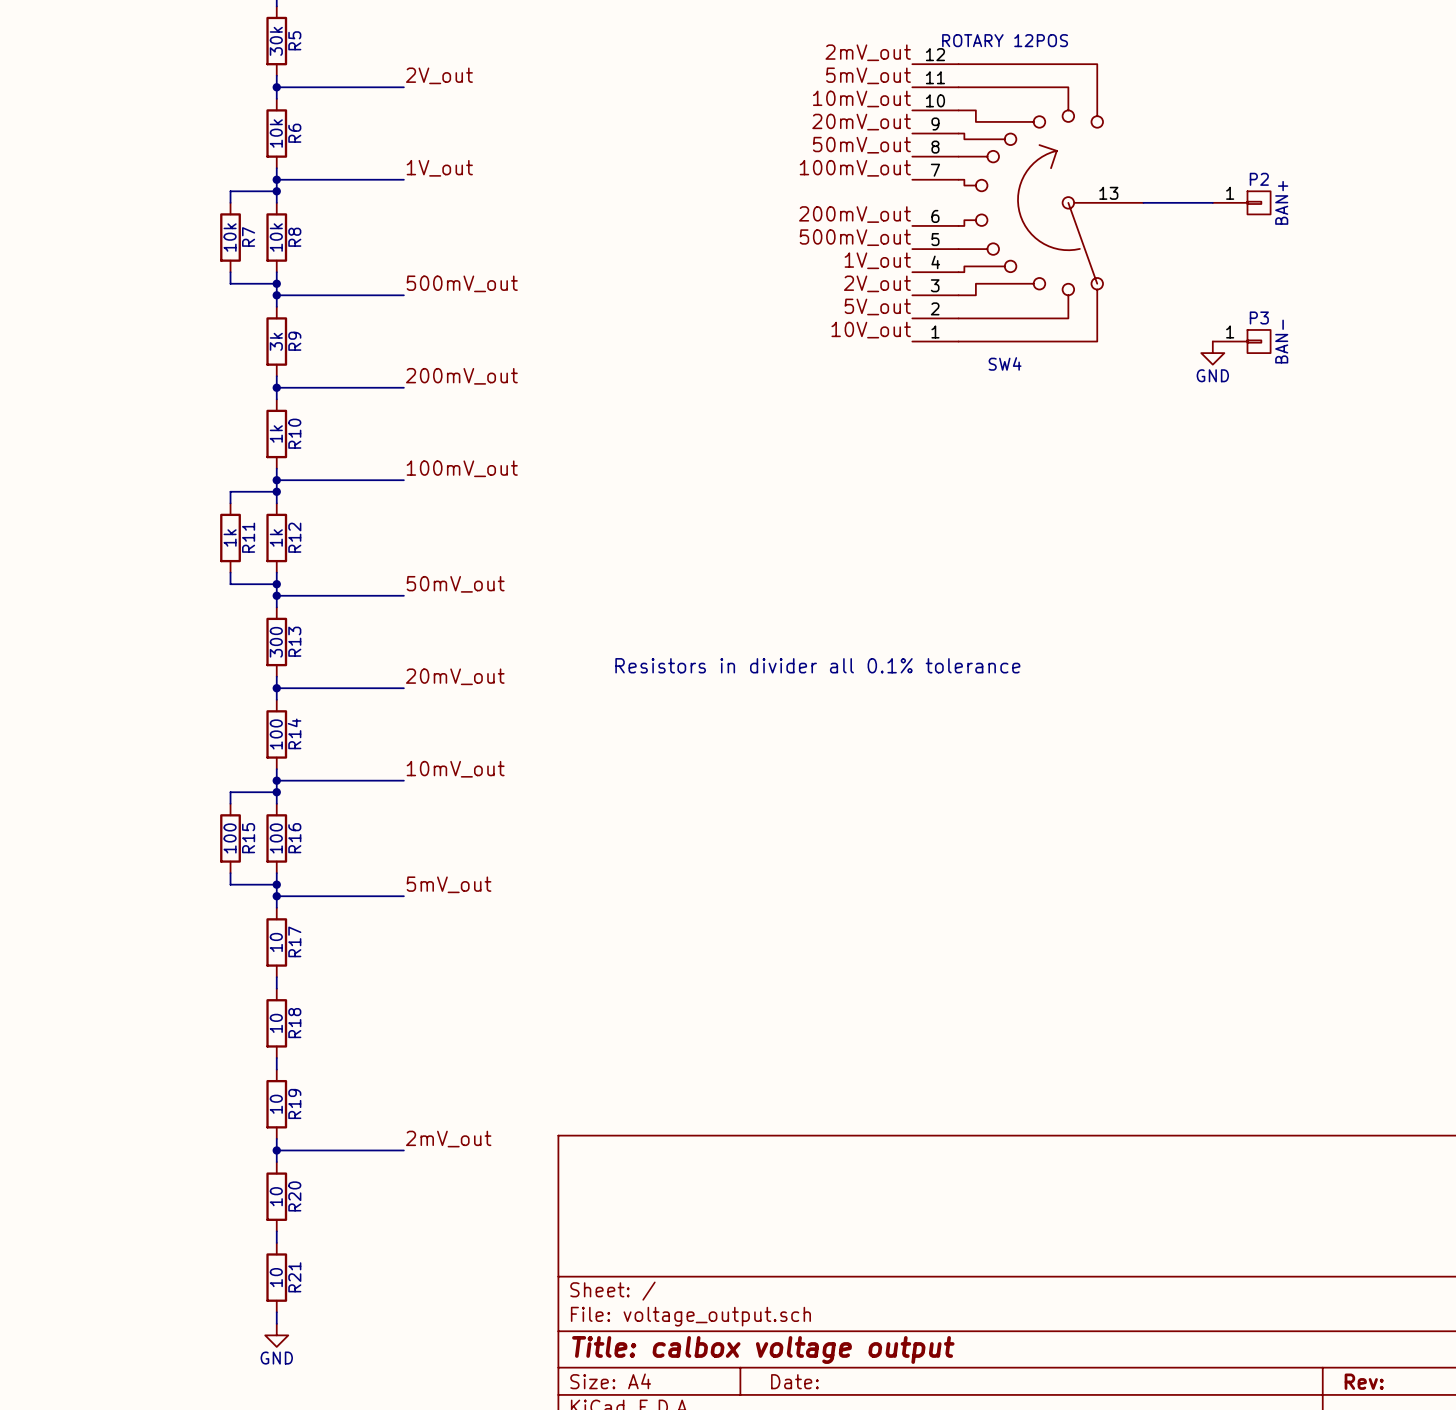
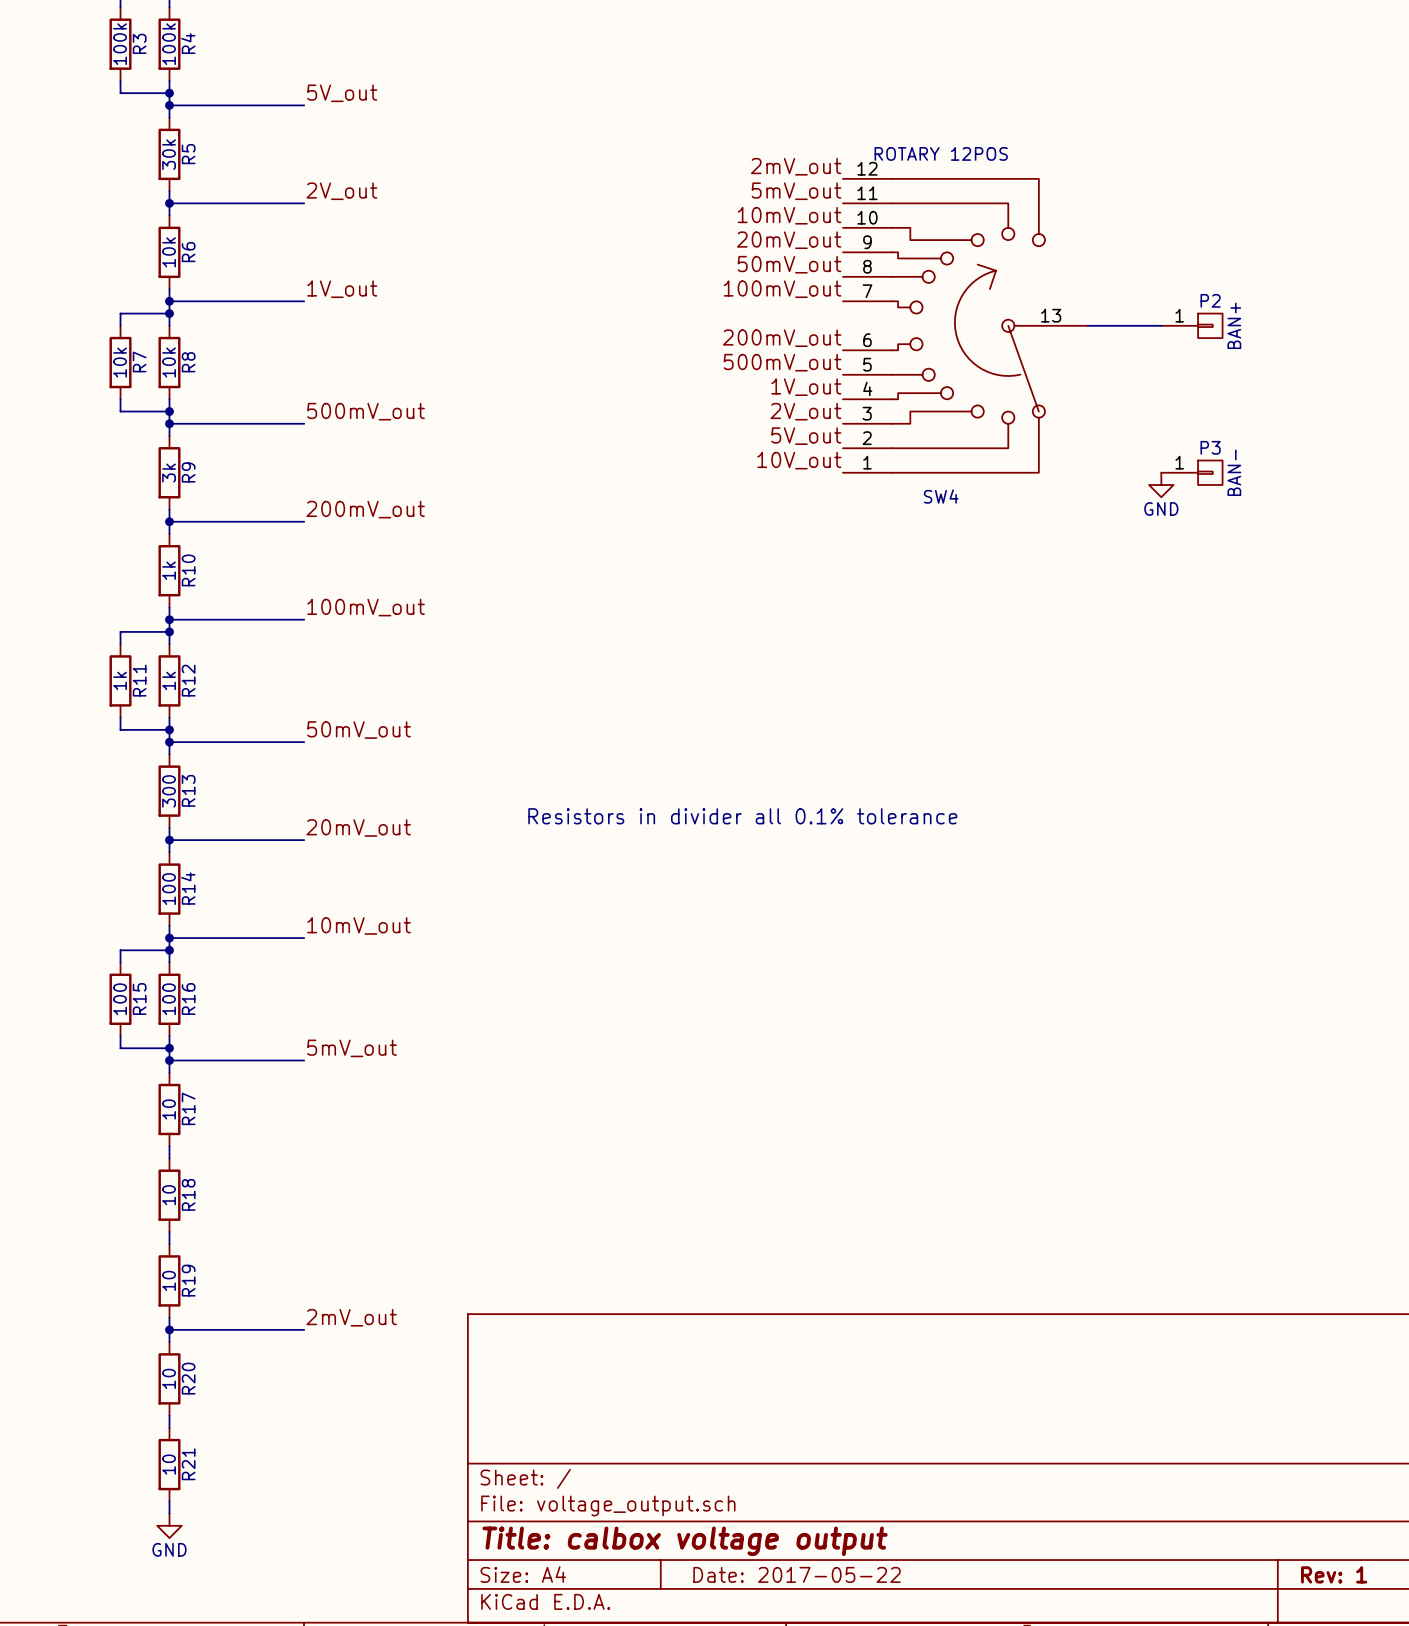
title block: Date: (794, 1381) -> Date: 2017-05-22 (797, 1574)
title block: Rev: (1364, 1381) -> Rev: 1 (1334, 1574)

